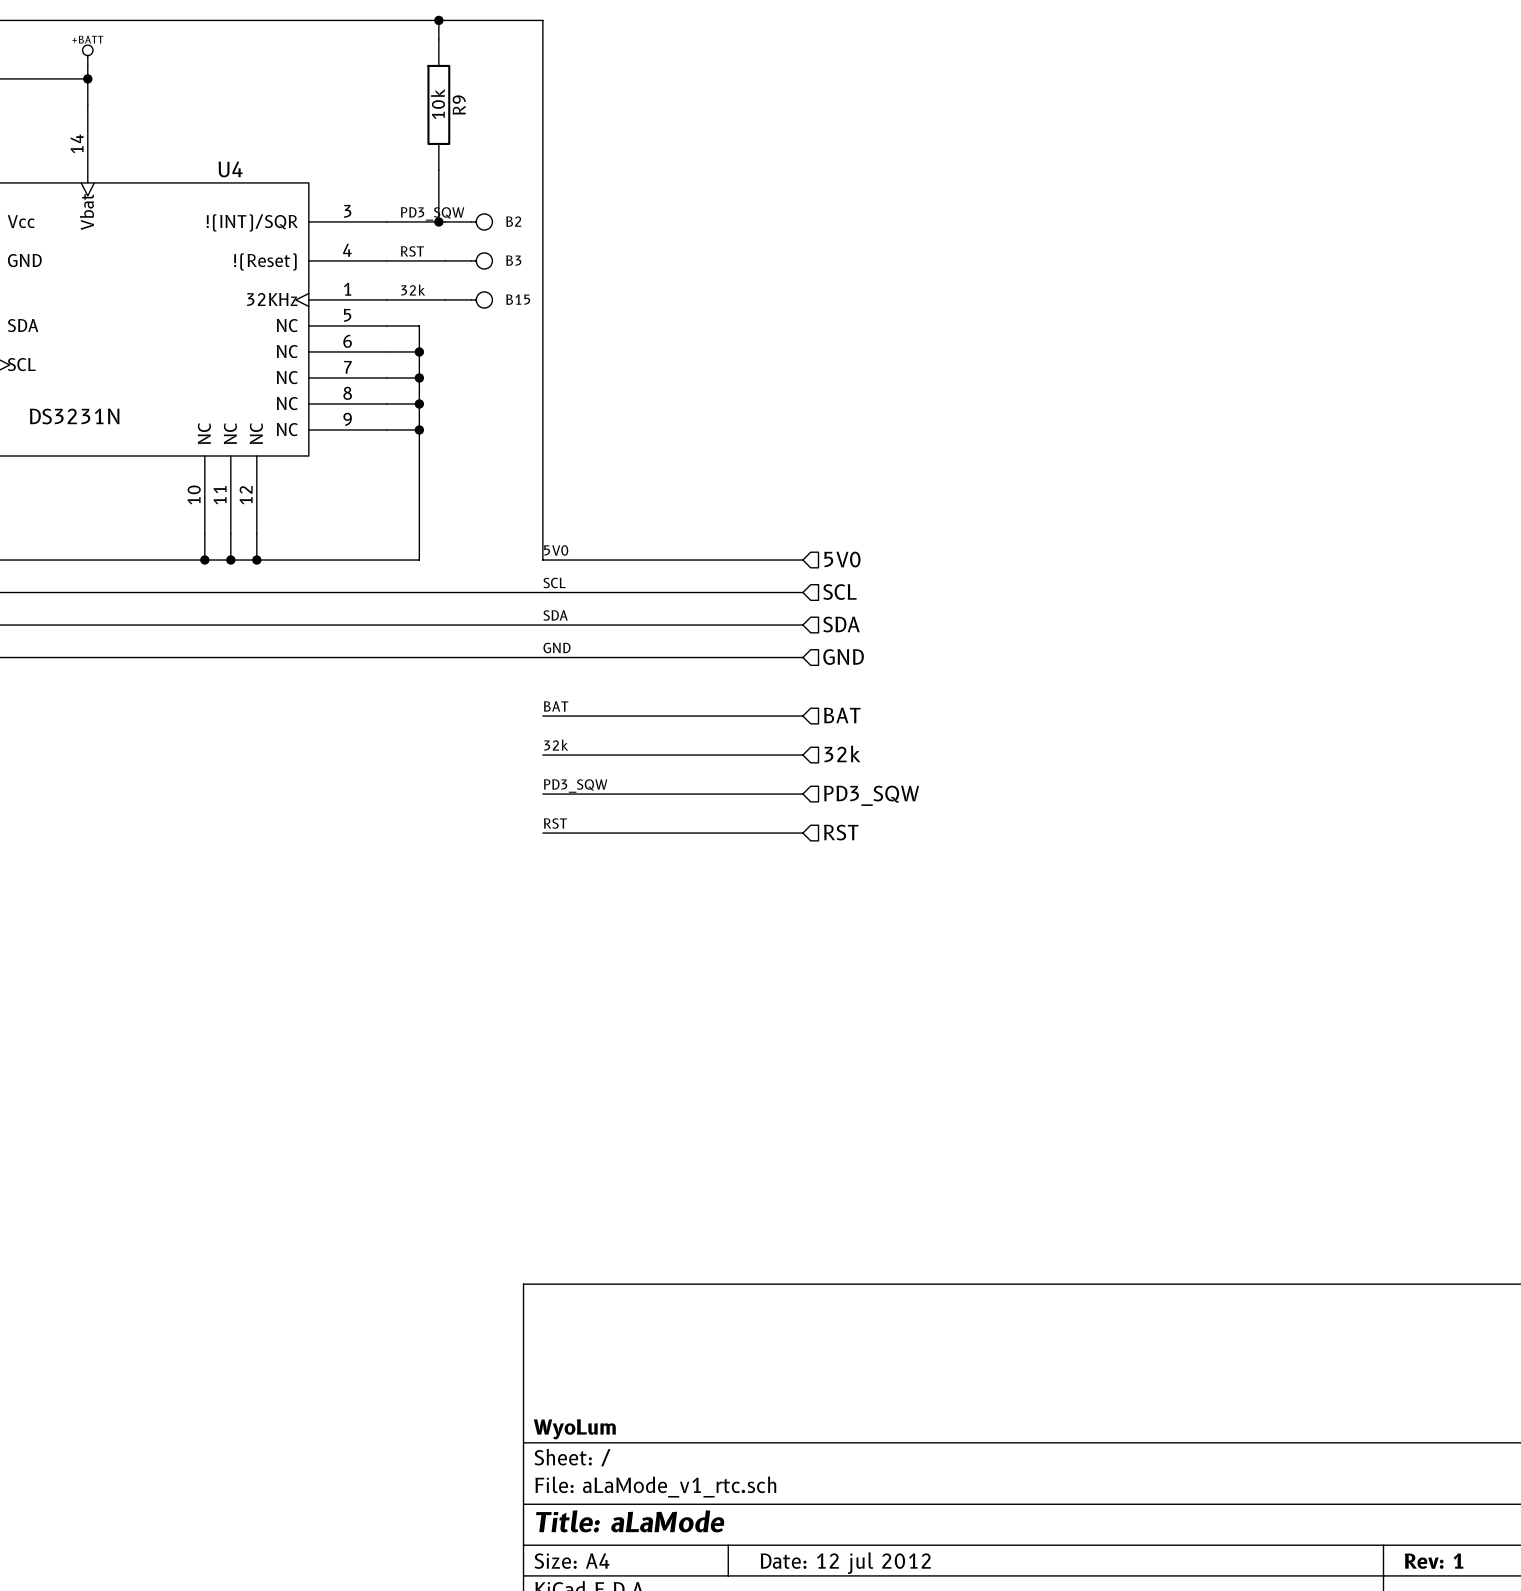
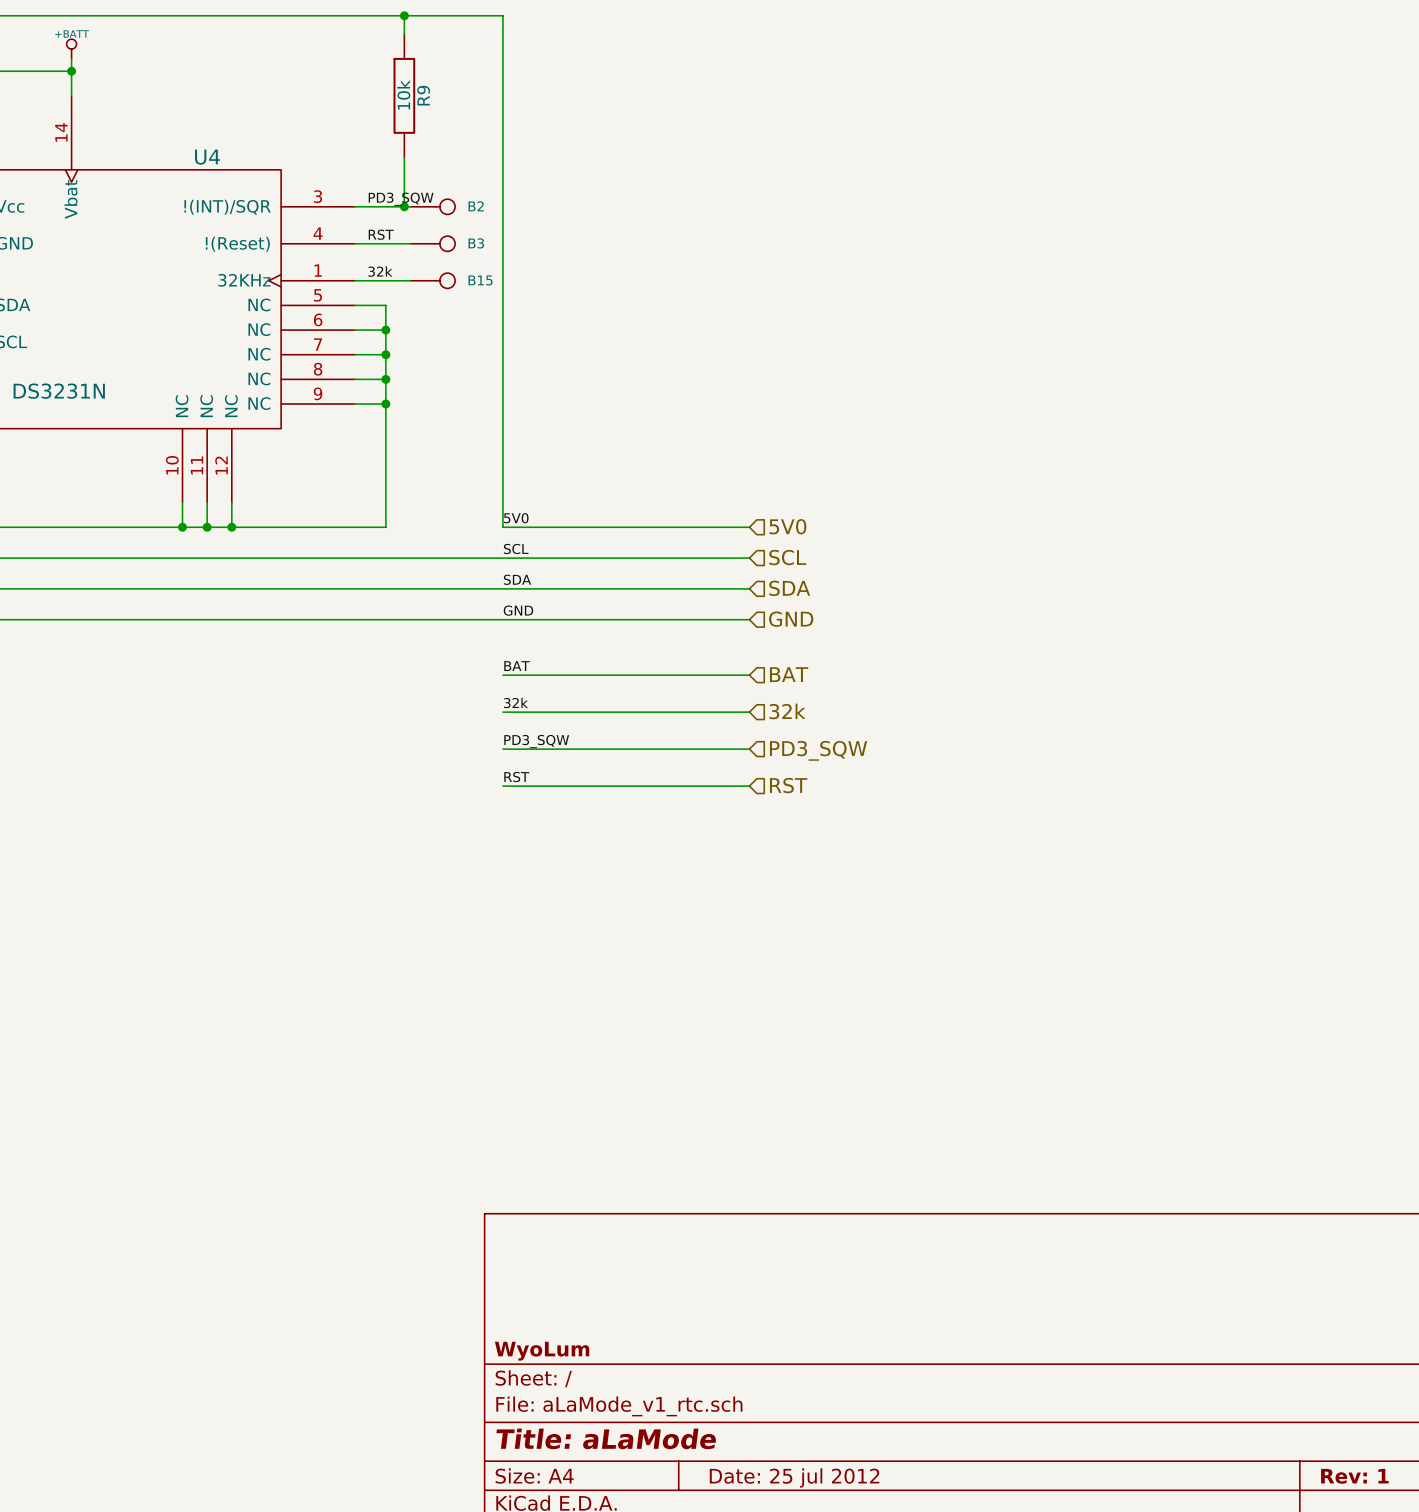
title block: Date: 12 jul 2012 (845, 1563) -> Date: 25 jul 2012 (794, 1477)

